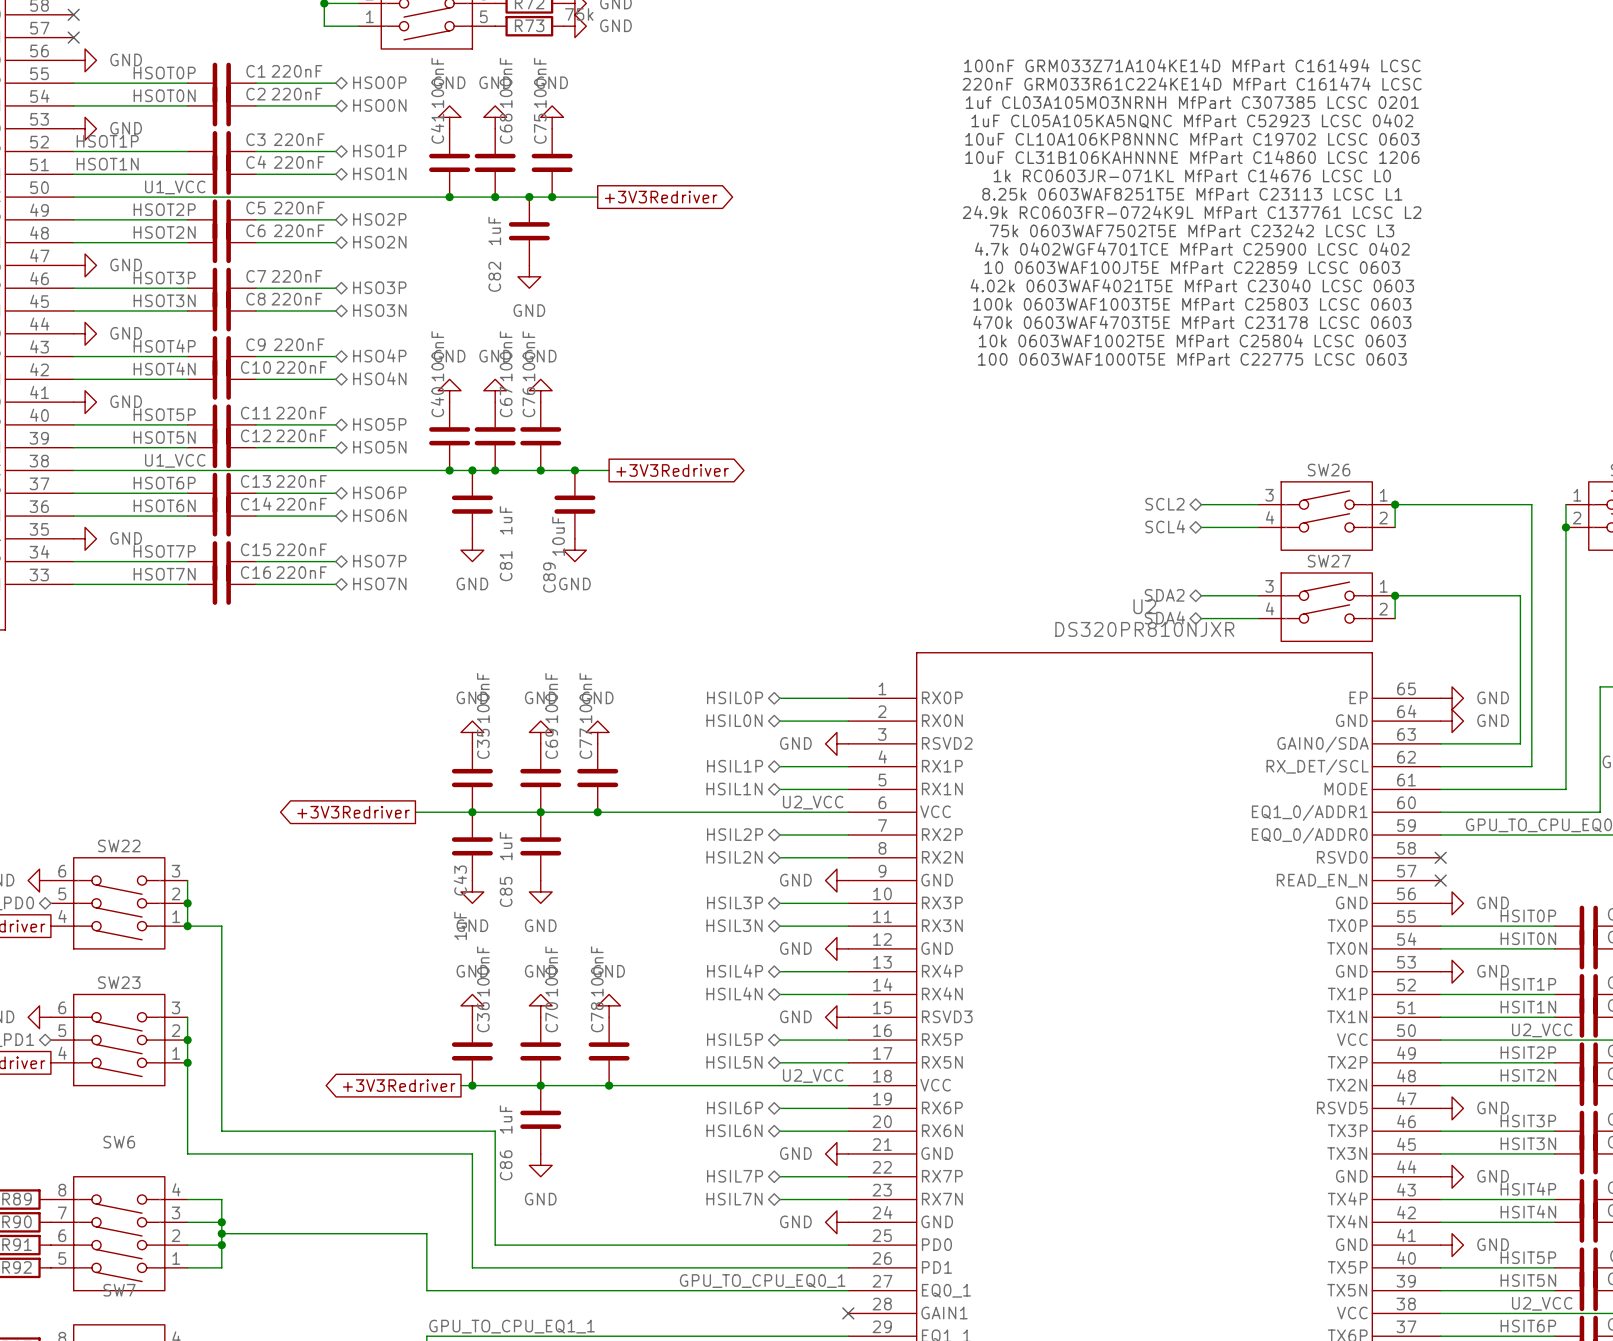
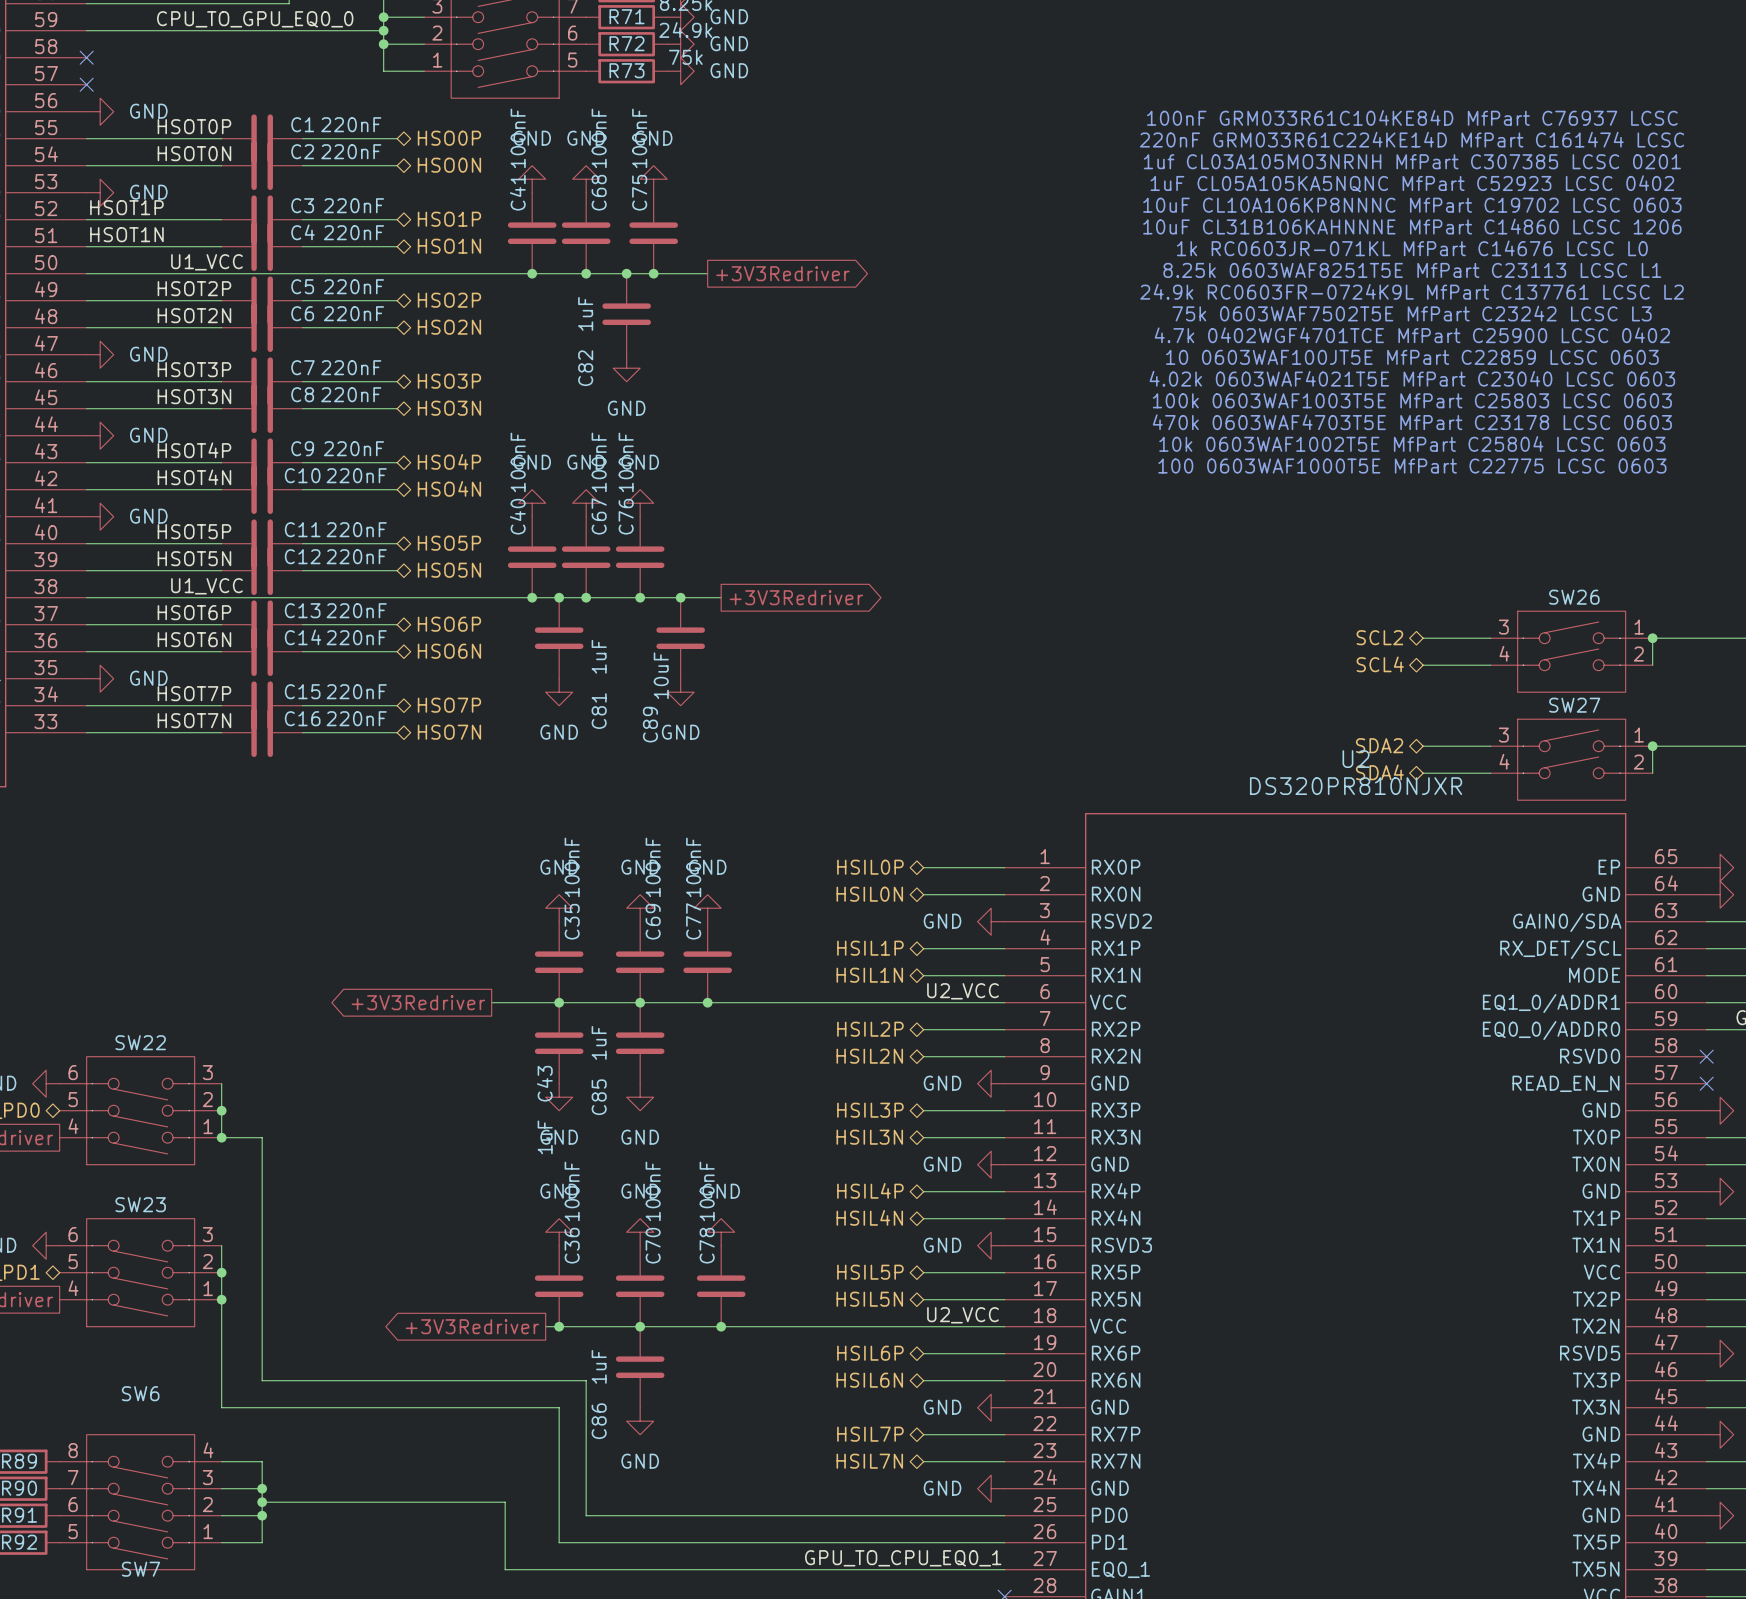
text: 100nF GRM033Z71A104KE14D MfPart C161494 LCSC (1192, 65) -> 100nF GRM033R61C104KE84D MfPart C76937 LCSC (1412, 117)

